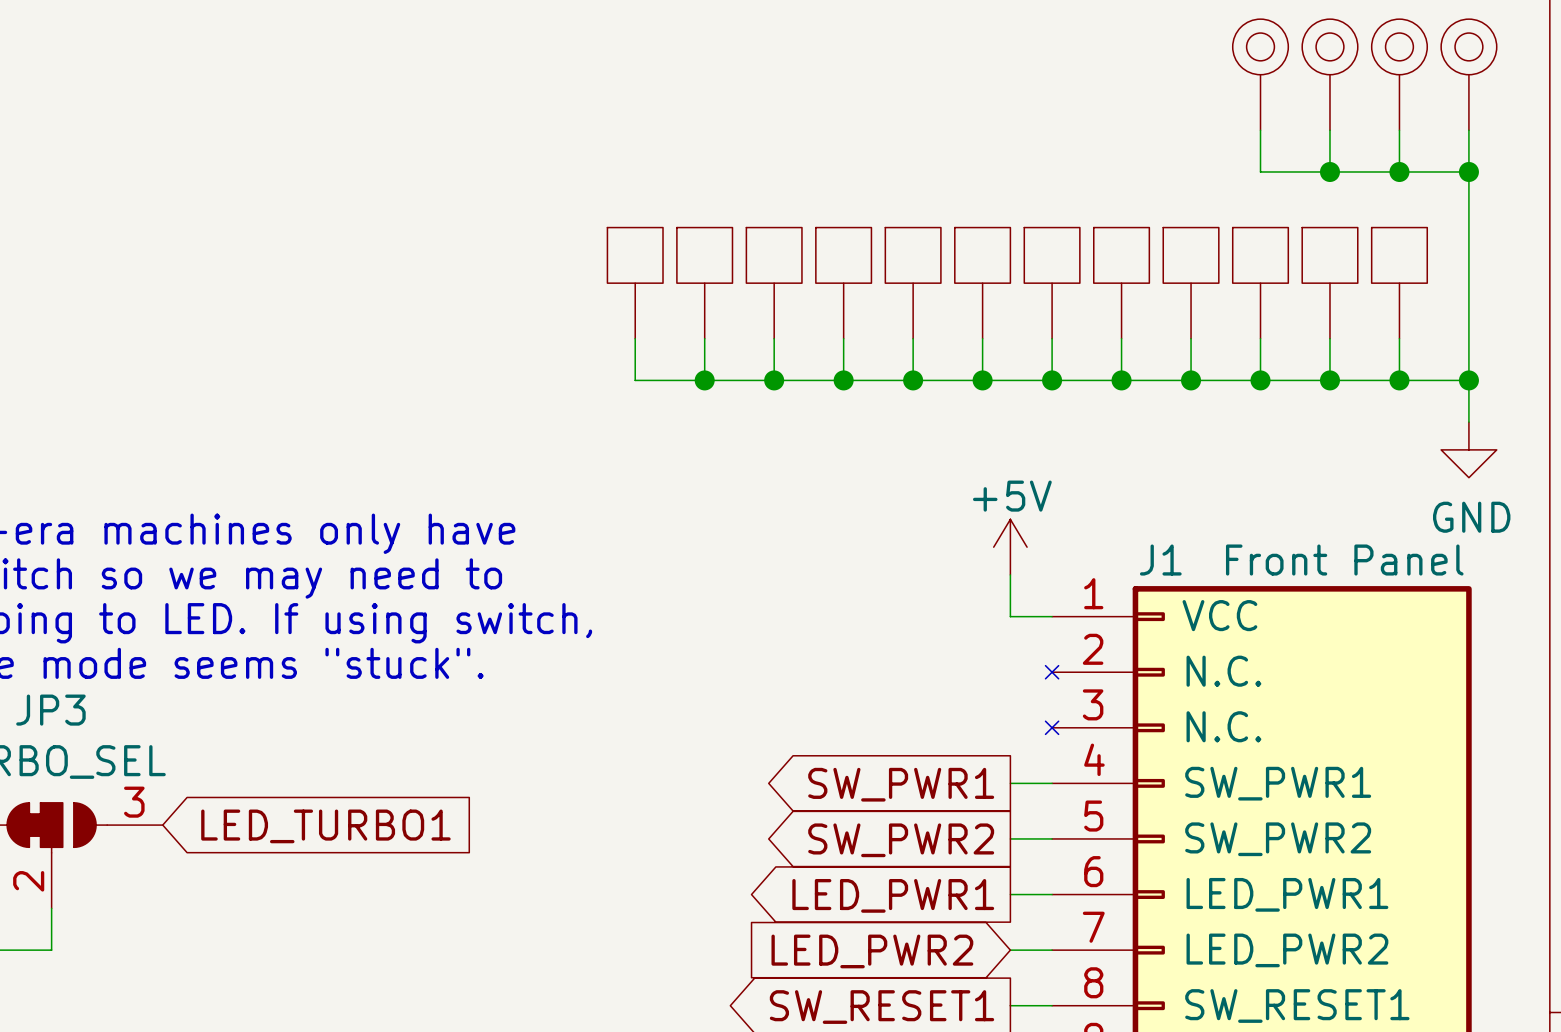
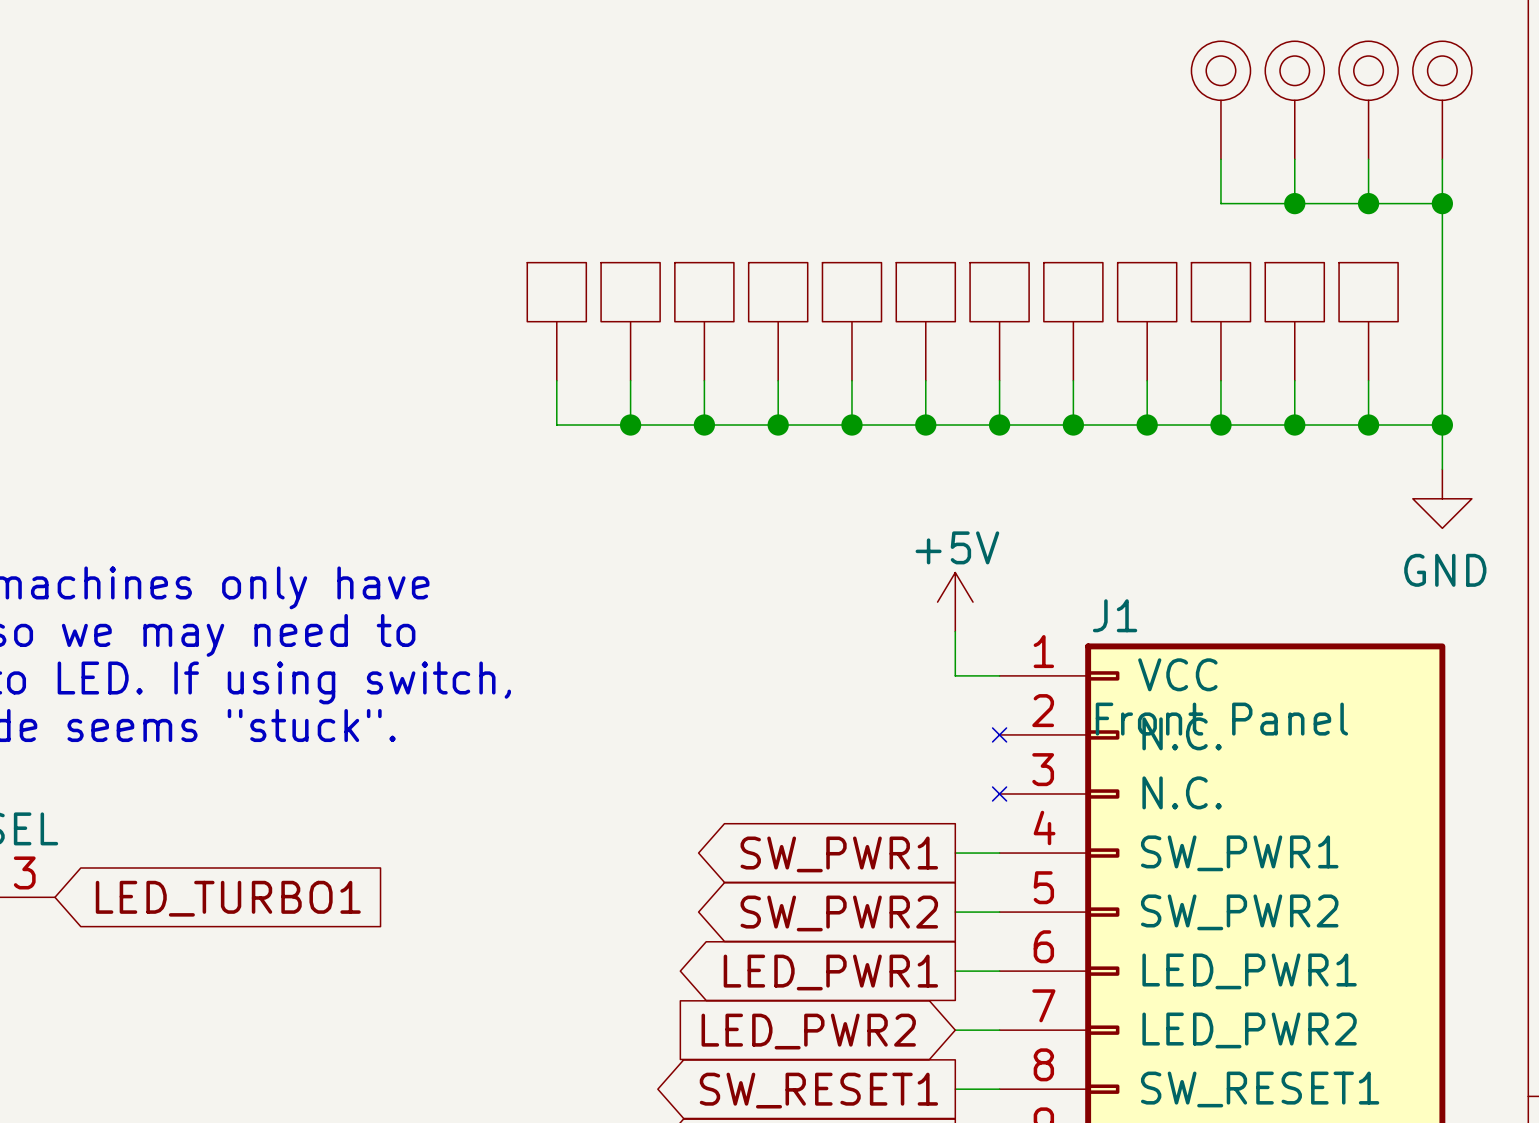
J1 value position: Front Panel (1344, 560) -> Front Panel (1221, 719)

